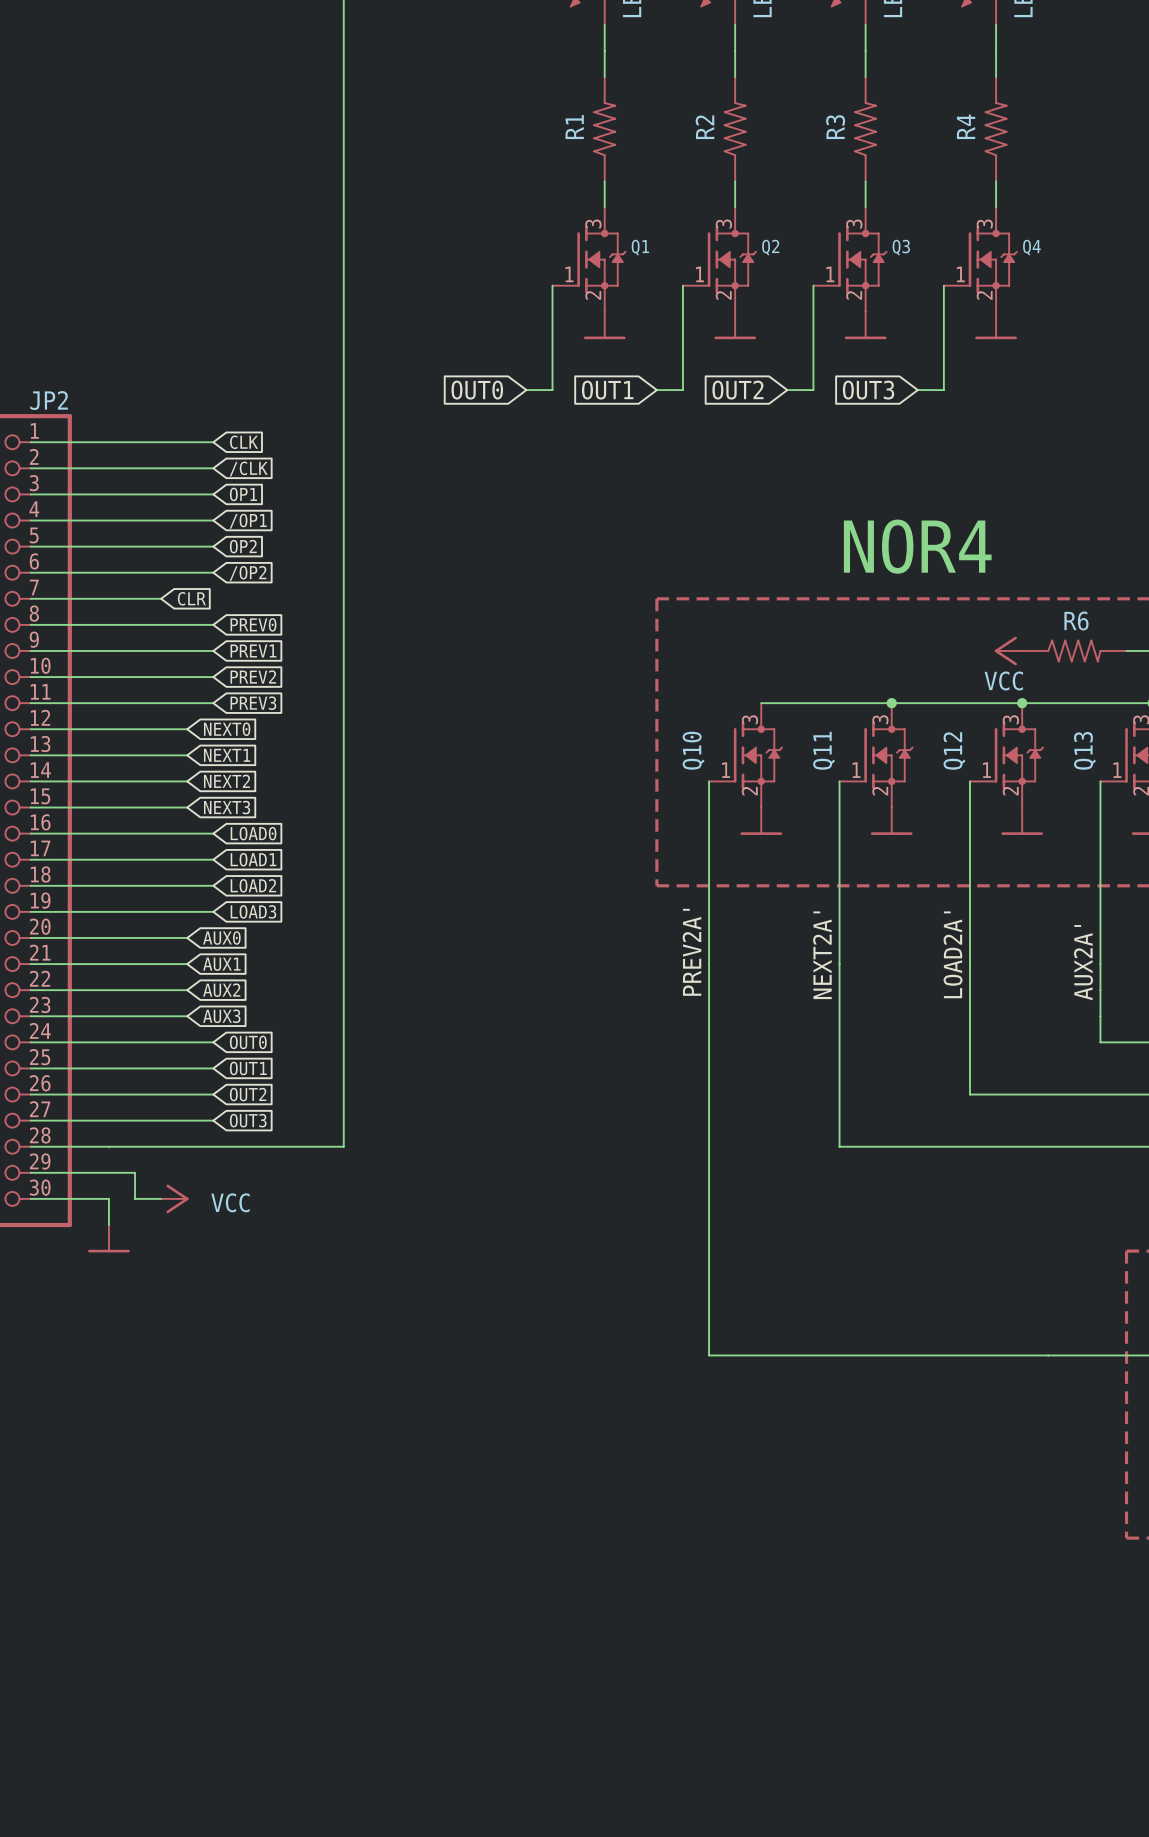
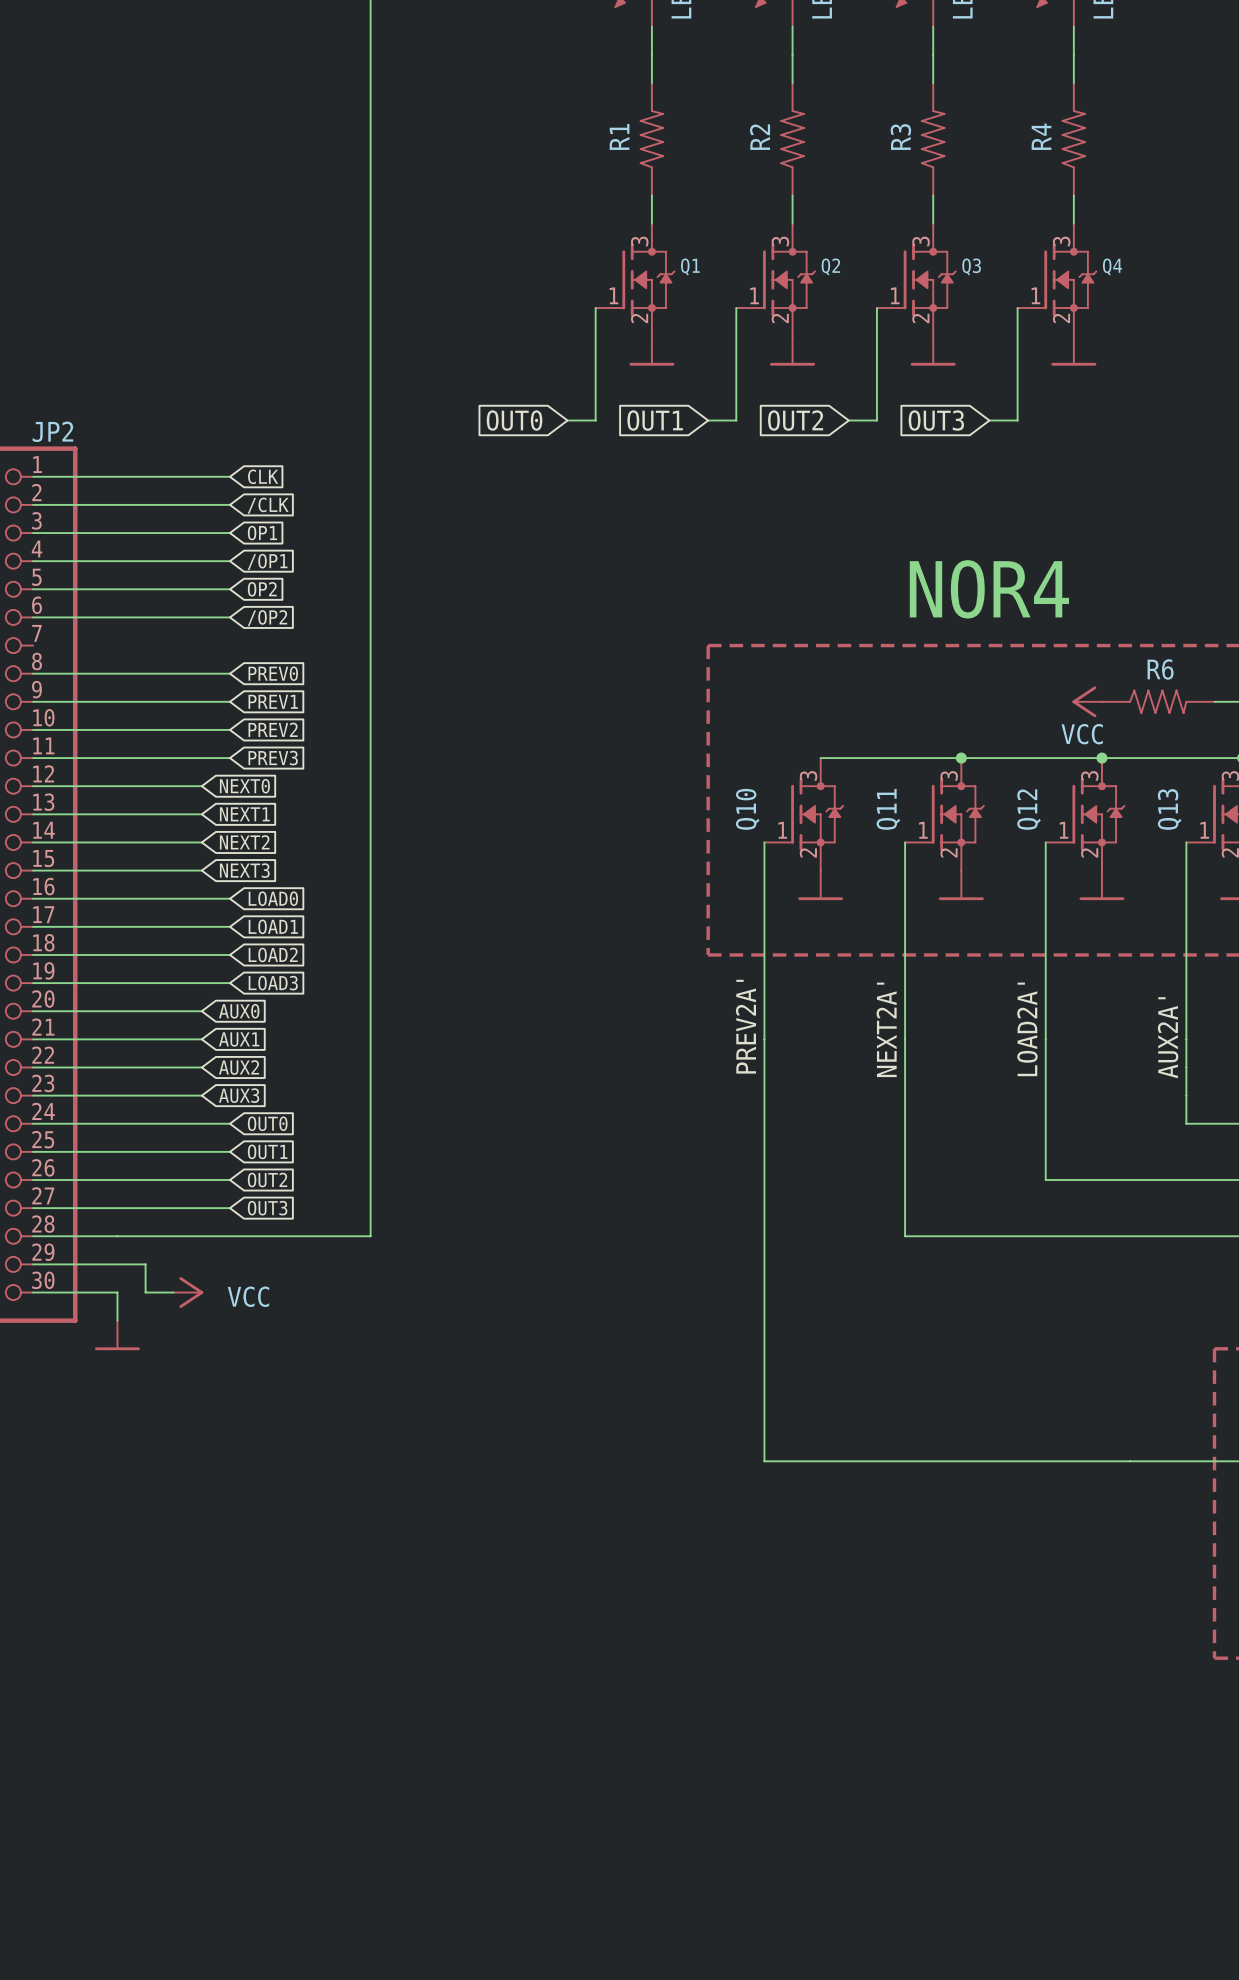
wire: (30, 598) (161, 598) -> none
global label: CLR (191, 598) -> none

